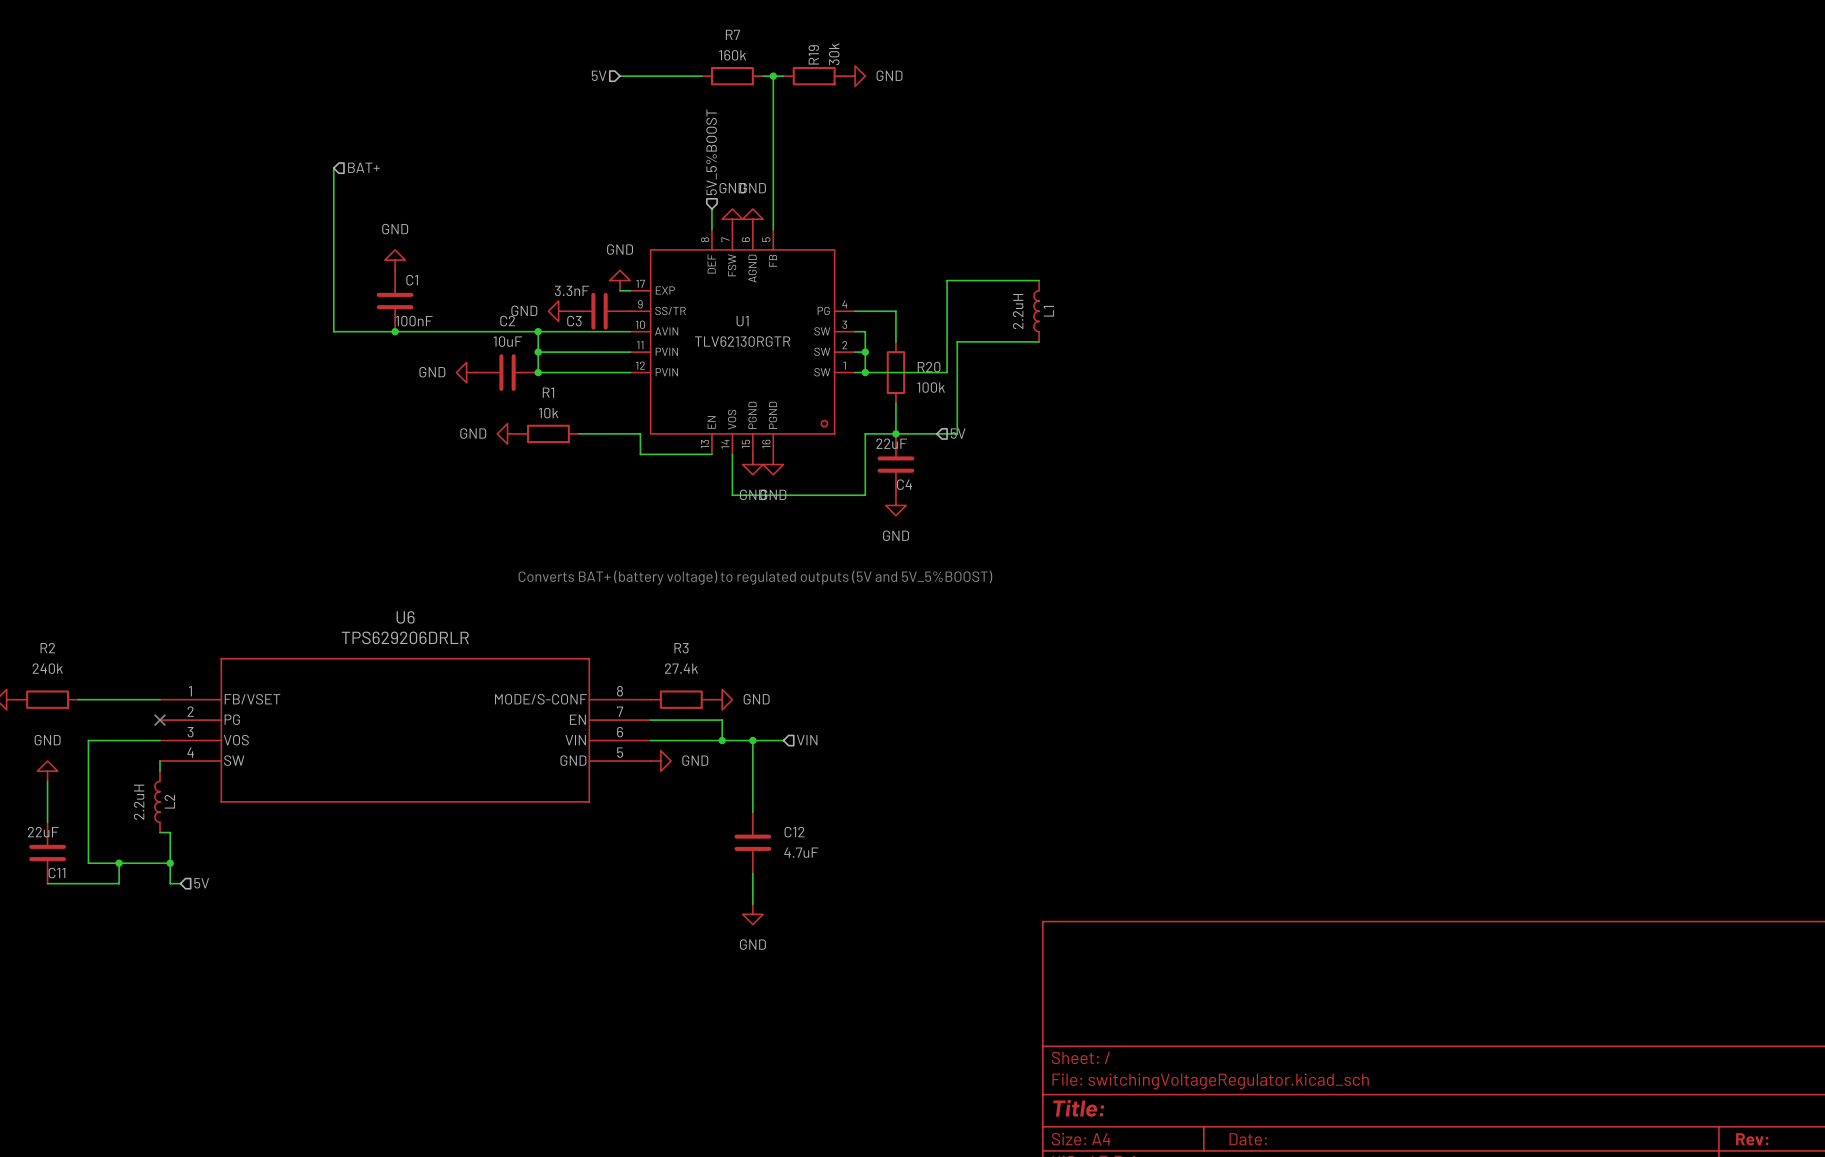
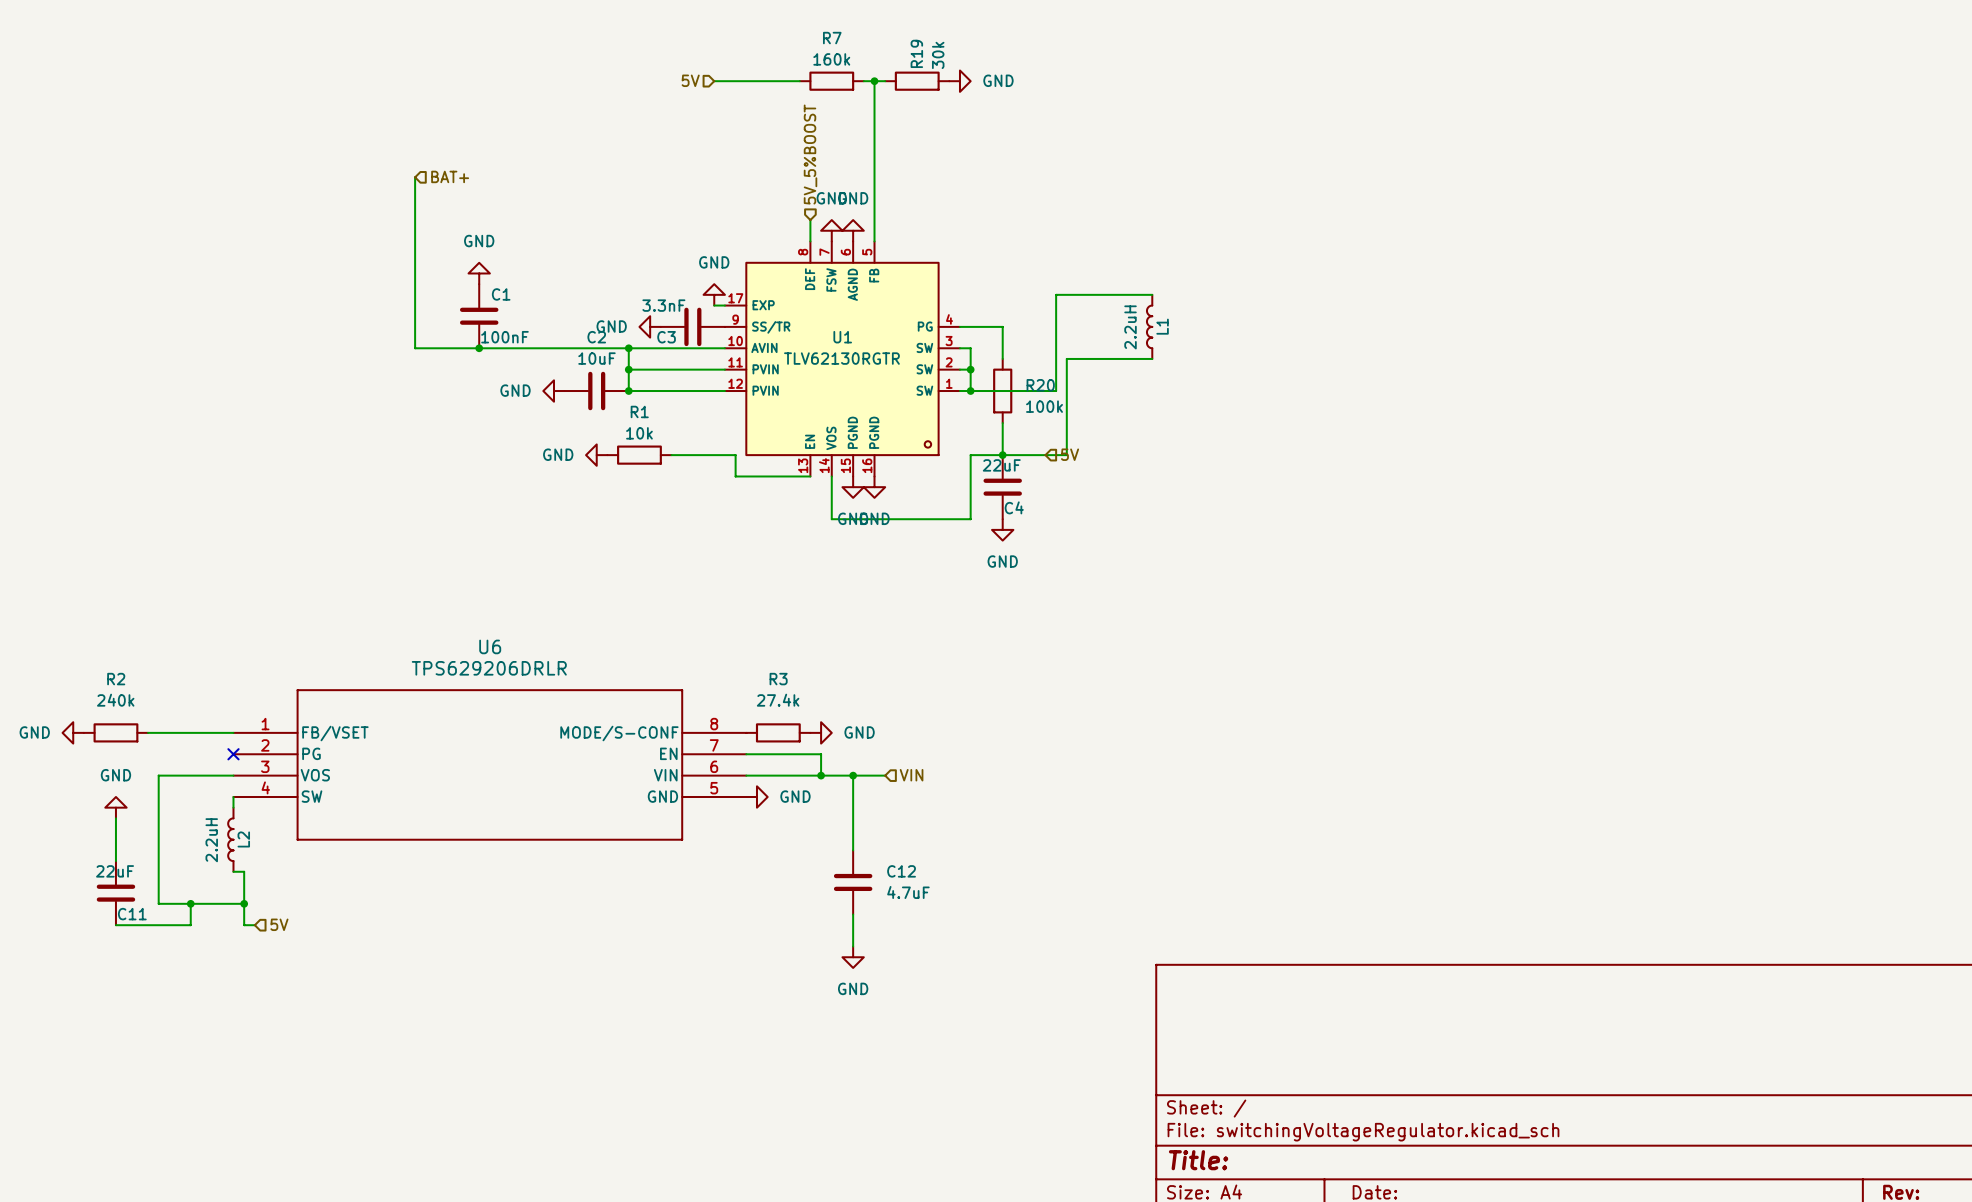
text: Converts BAT+ (battery voltage) to regulated outputs (5V and 5V_5%BOOST) (755, 577) -> none

